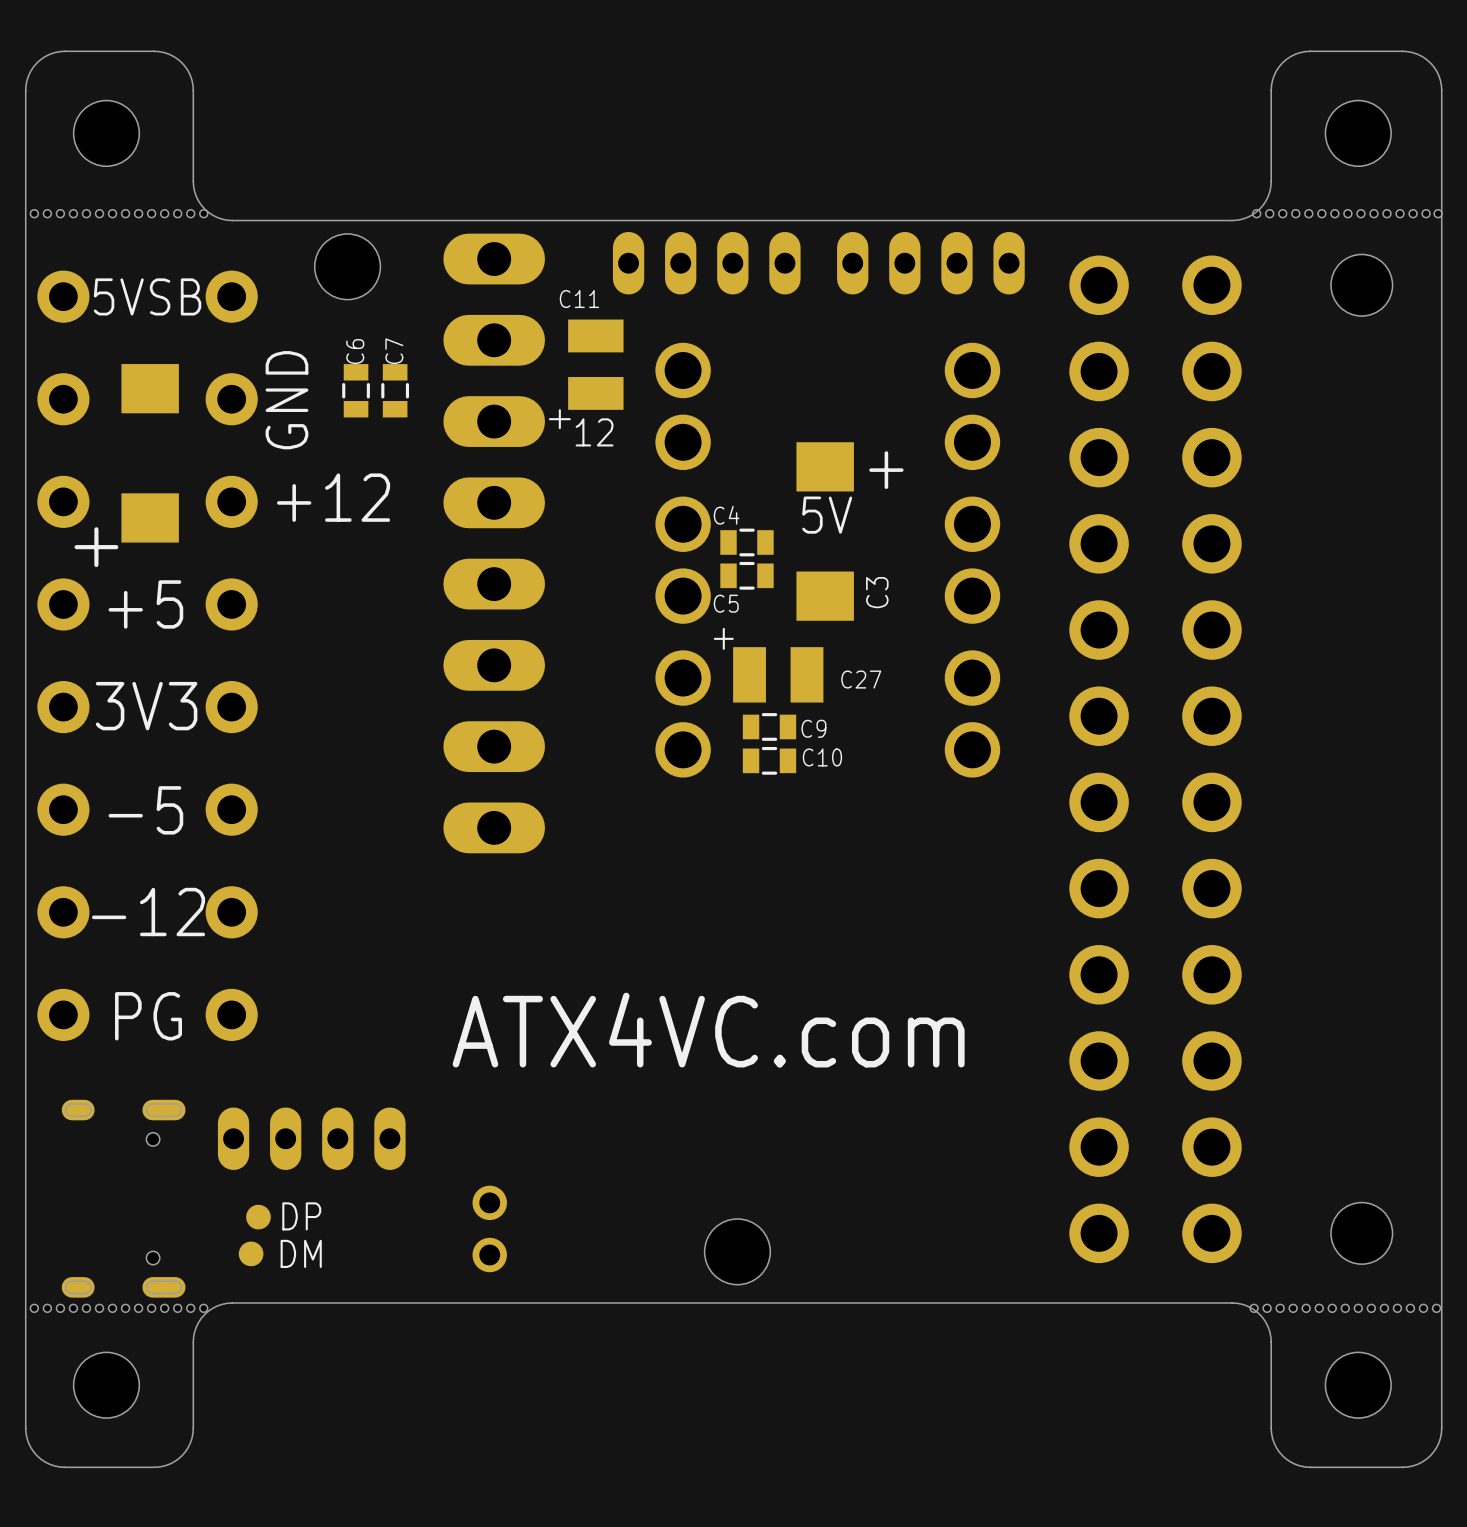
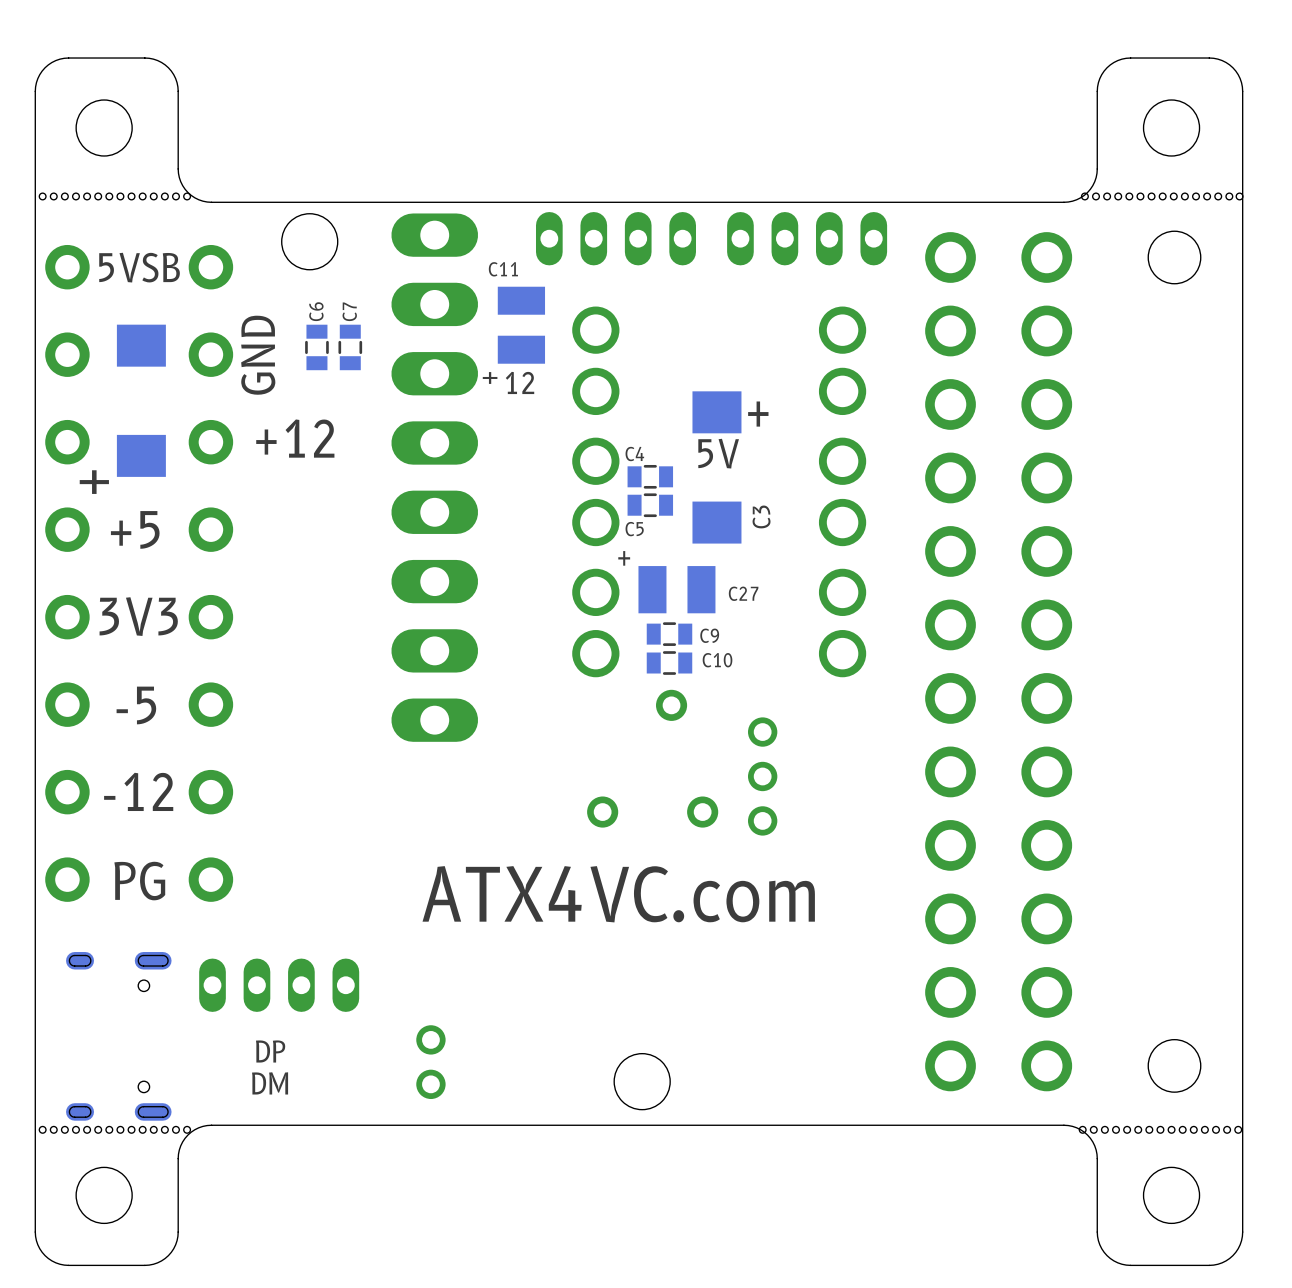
part: none -> (671, 705)
part: none -> (762, 776)
part: none -> (602, 812)
part: none -> (702, 812)
part: (258, 1217) -> none
part: (251, 1253) -> none

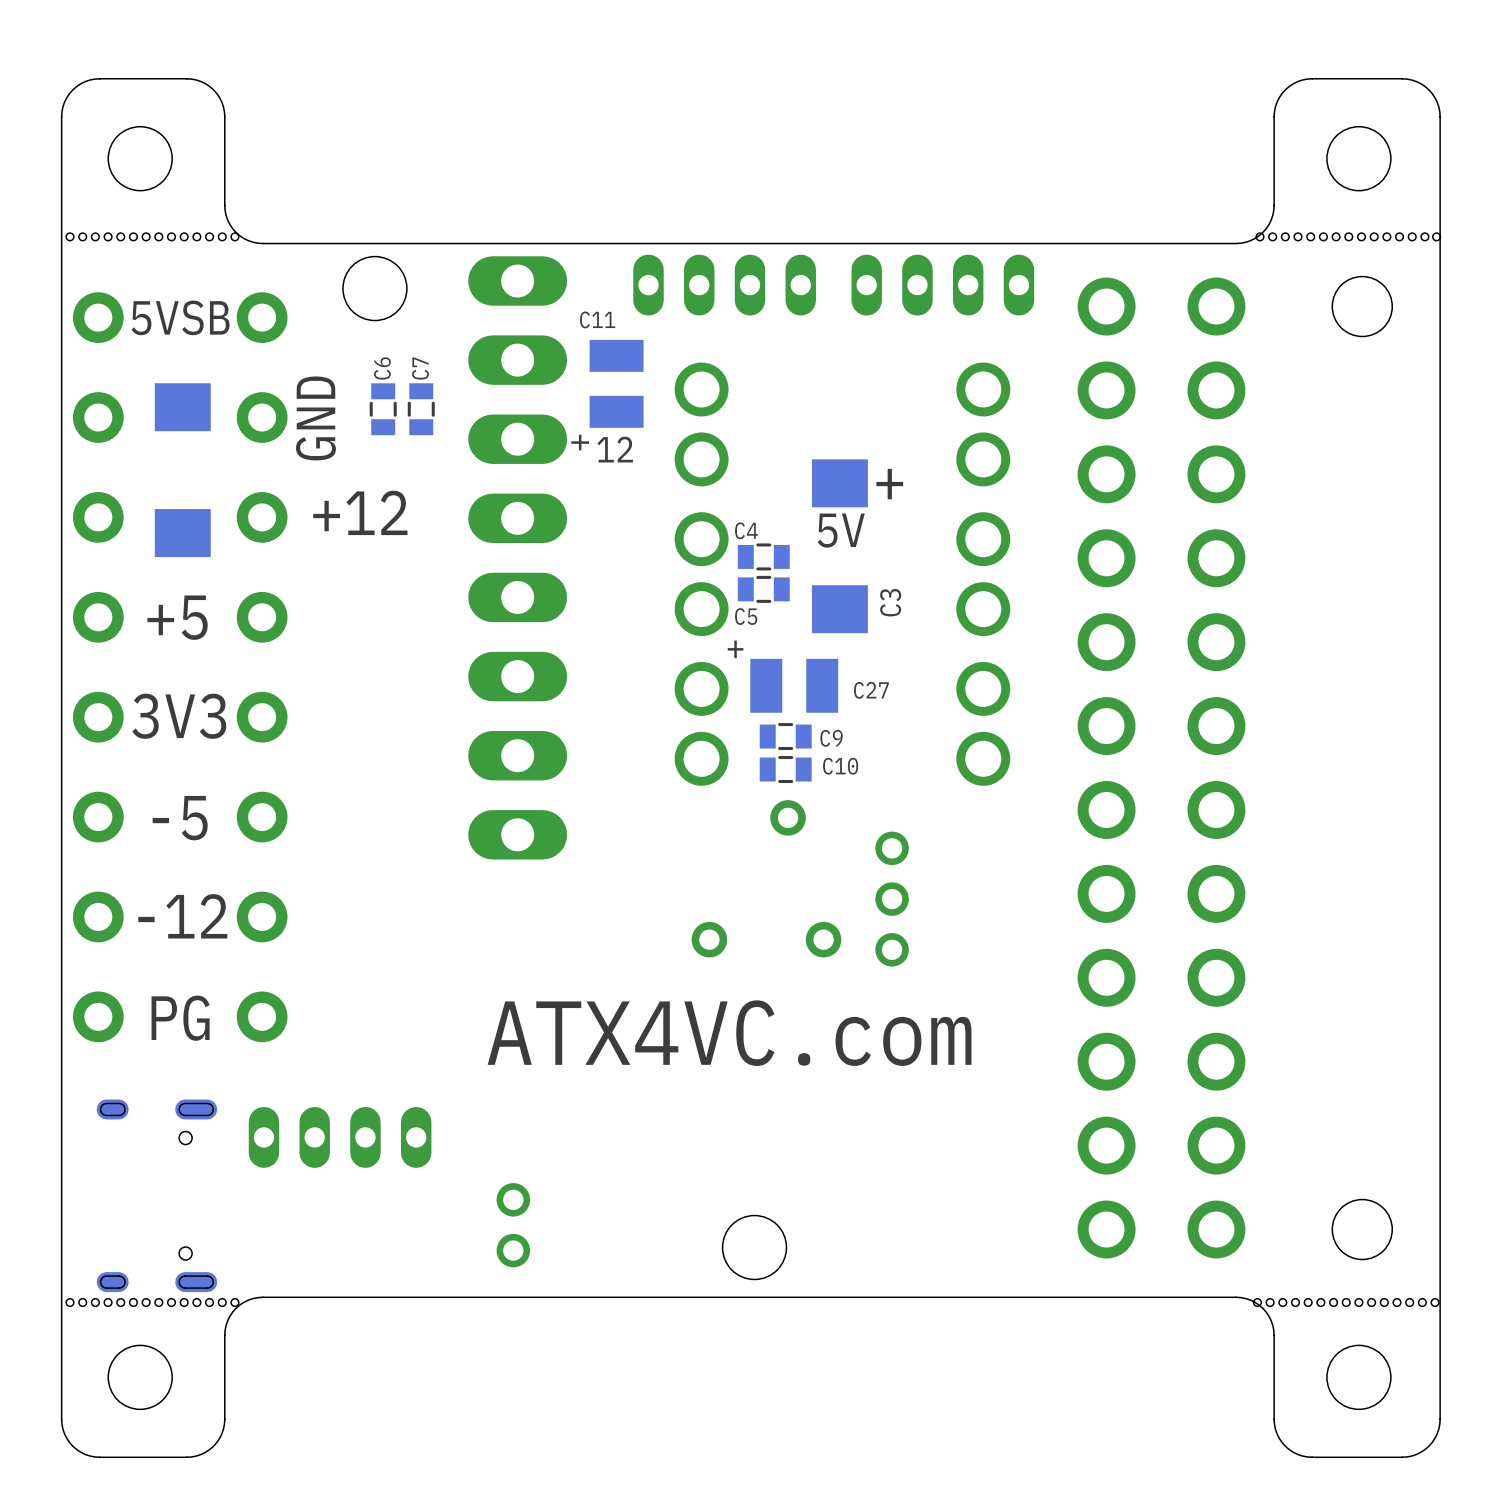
text: + (94, 482) -> none
text: DP (270, 1051) -> none
text: DM (270, 1083) -> none

